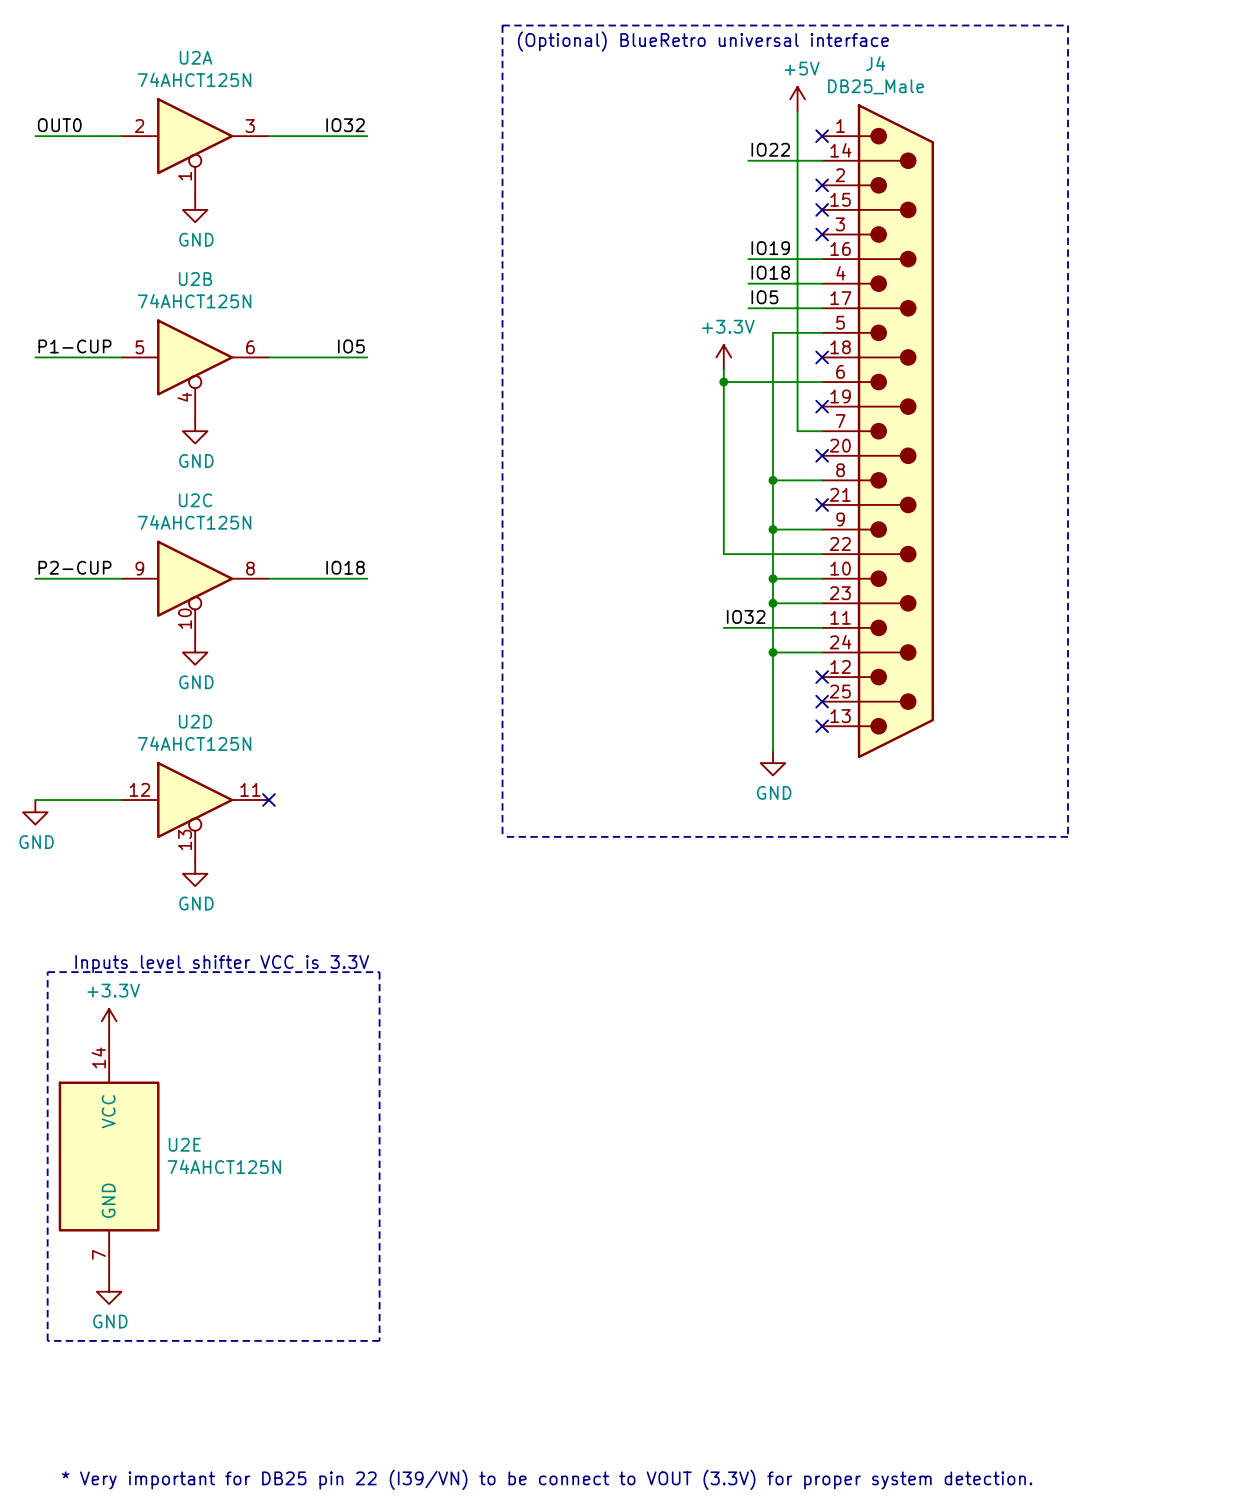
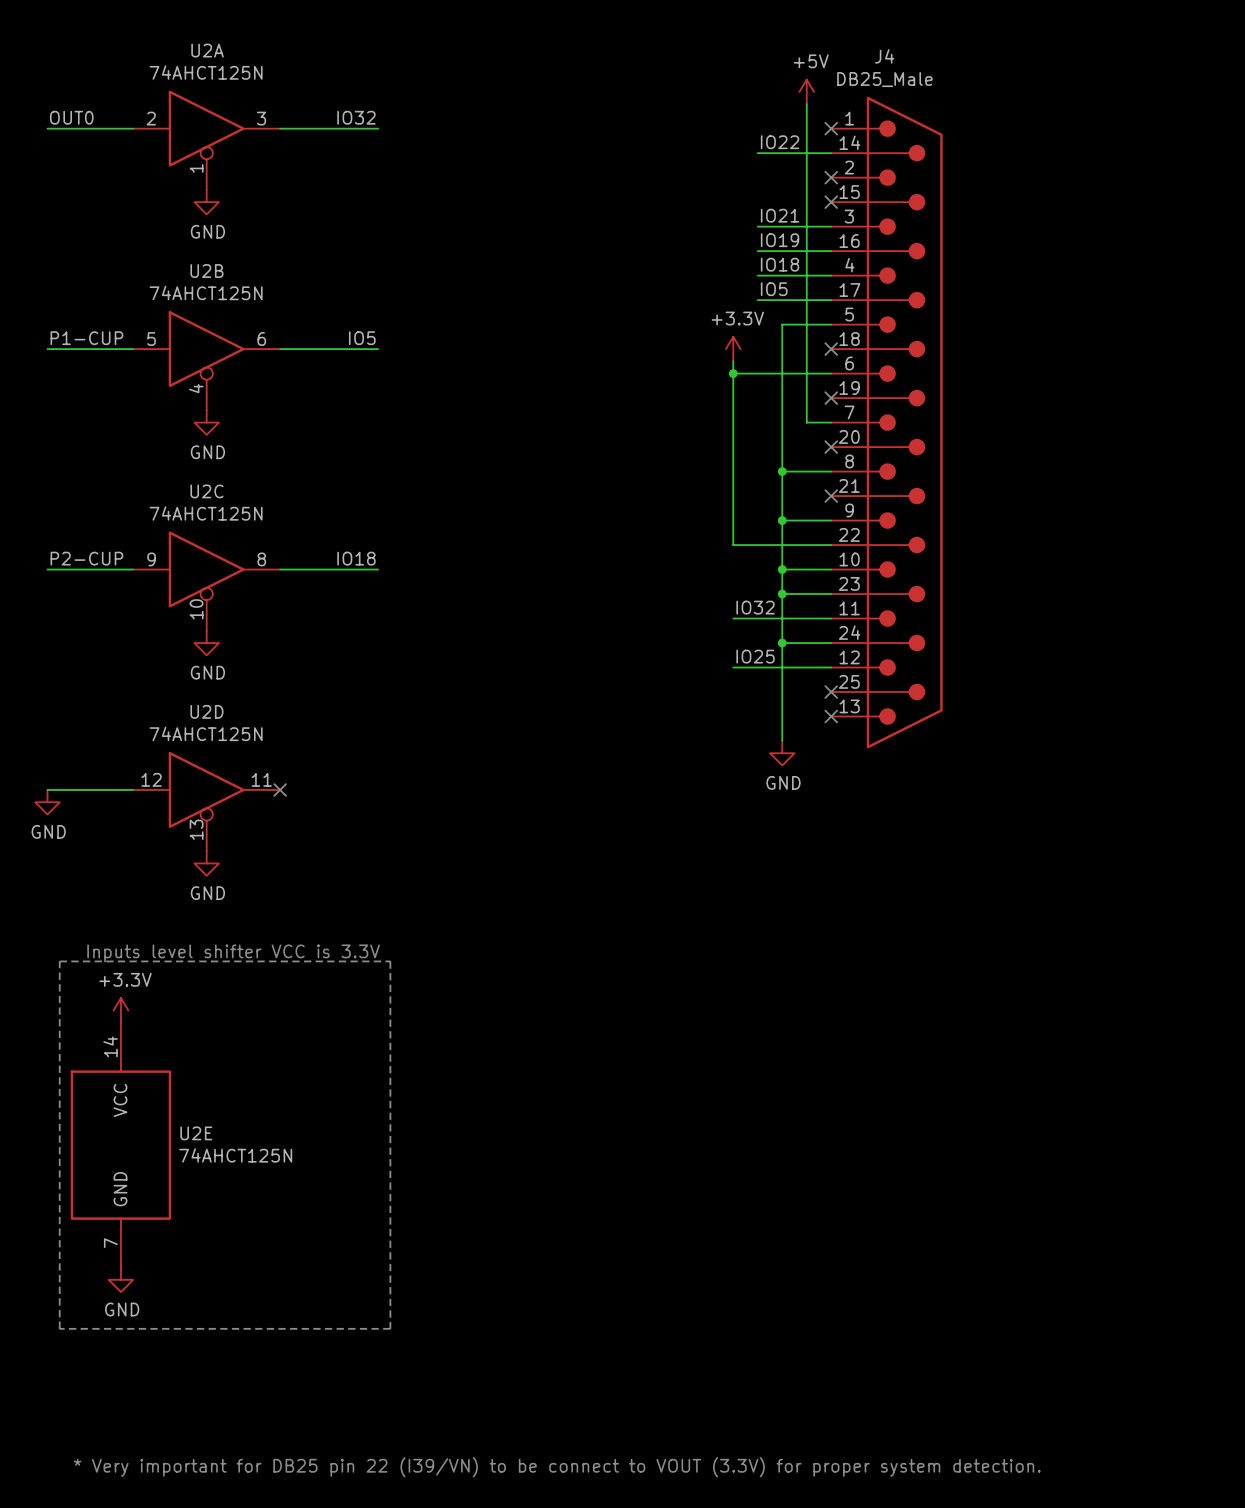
line: (502, 25) (1068, 25) (1068, 836) (502, 836) (502, 25) -> none
text: (Optional) BlueRetro universal interface (703, 41) -> none
label: none -> IO21 (780, 215)
wire: none -> (757, 226) (831, 226)
no-connect mark: (822, 234) -> none
label: none -> IO25 (755, 656)
wire: none -> (733, 667) (831, 667)
no-connect mark: (822, 677) -> none

